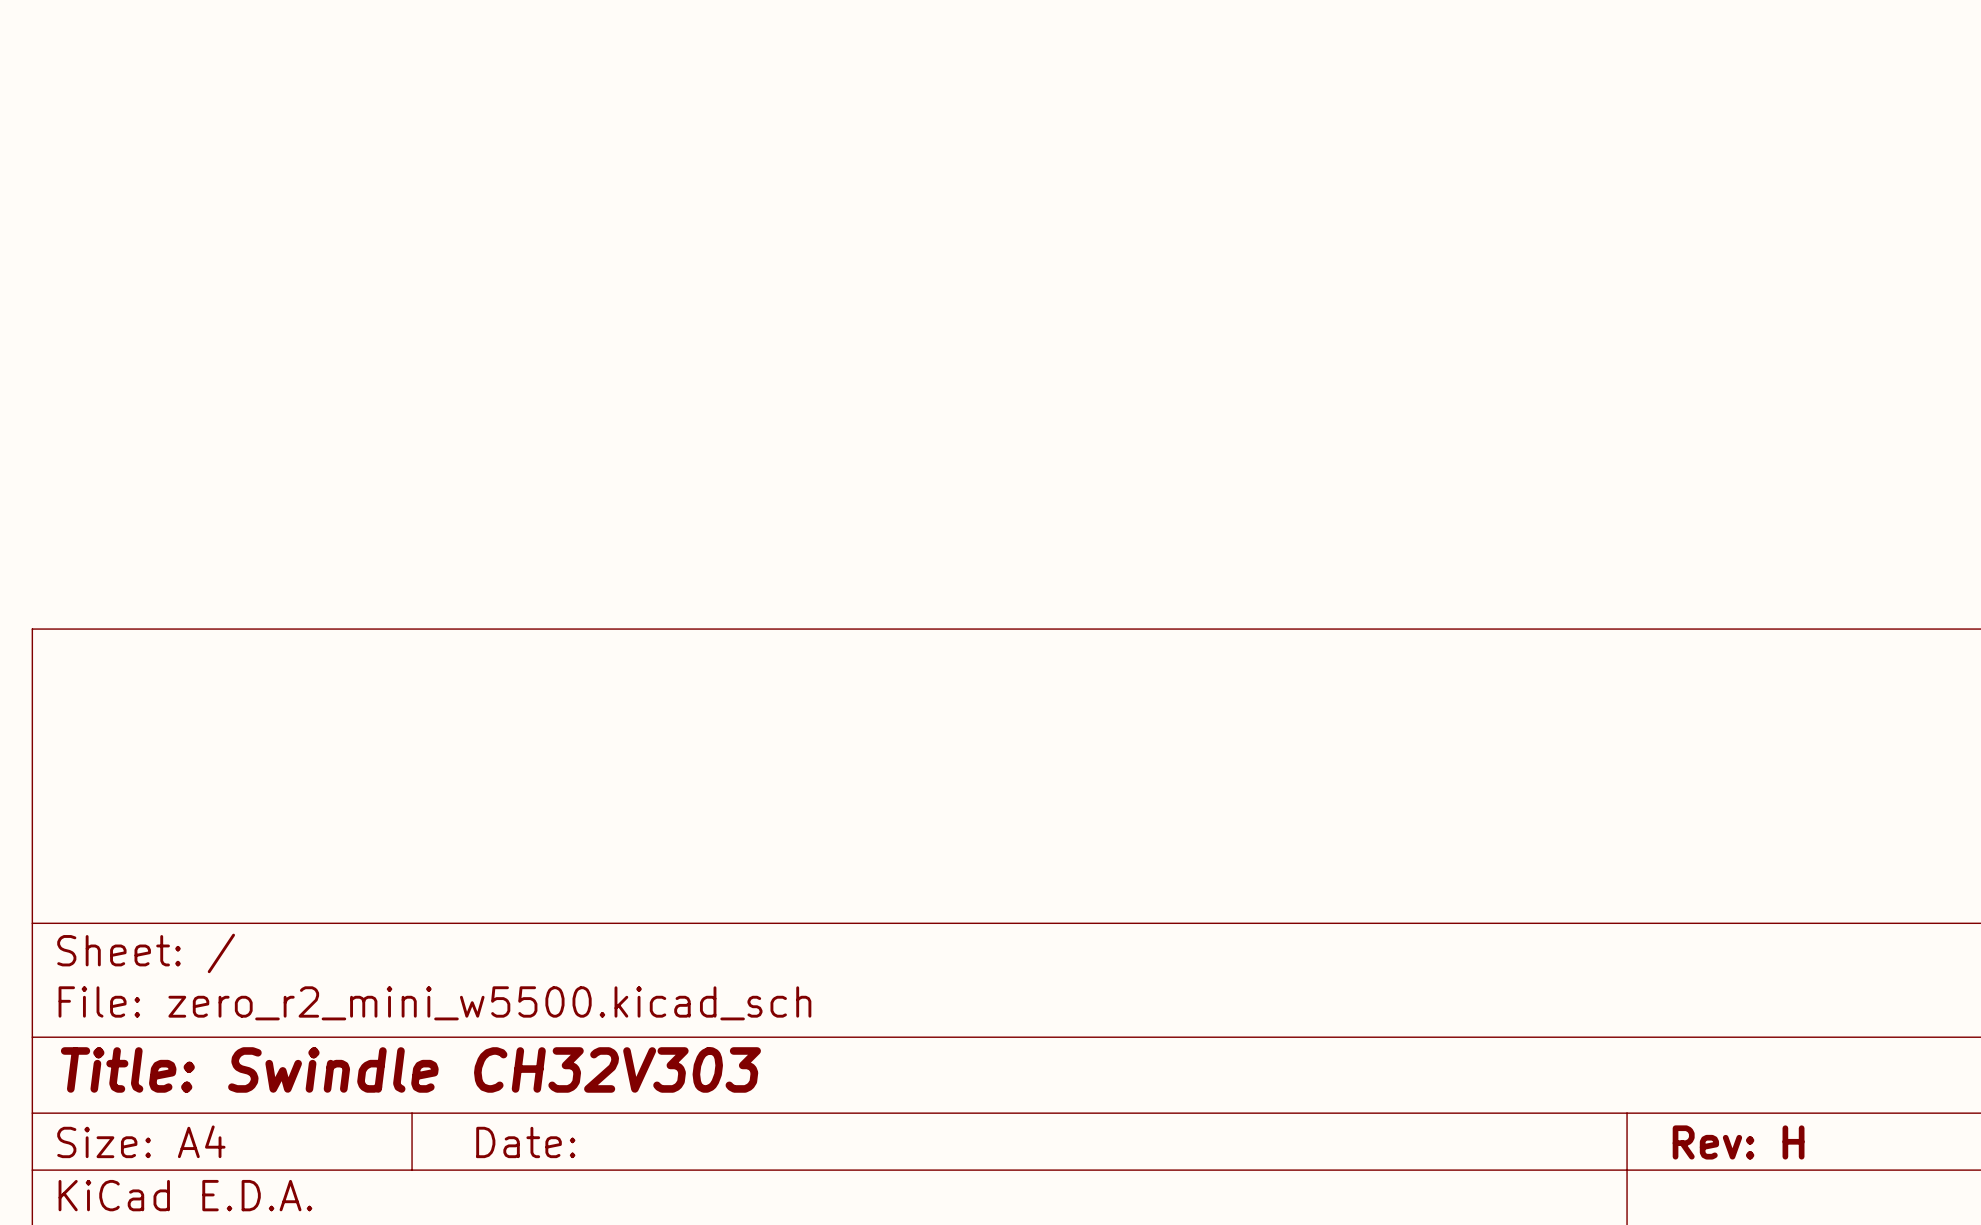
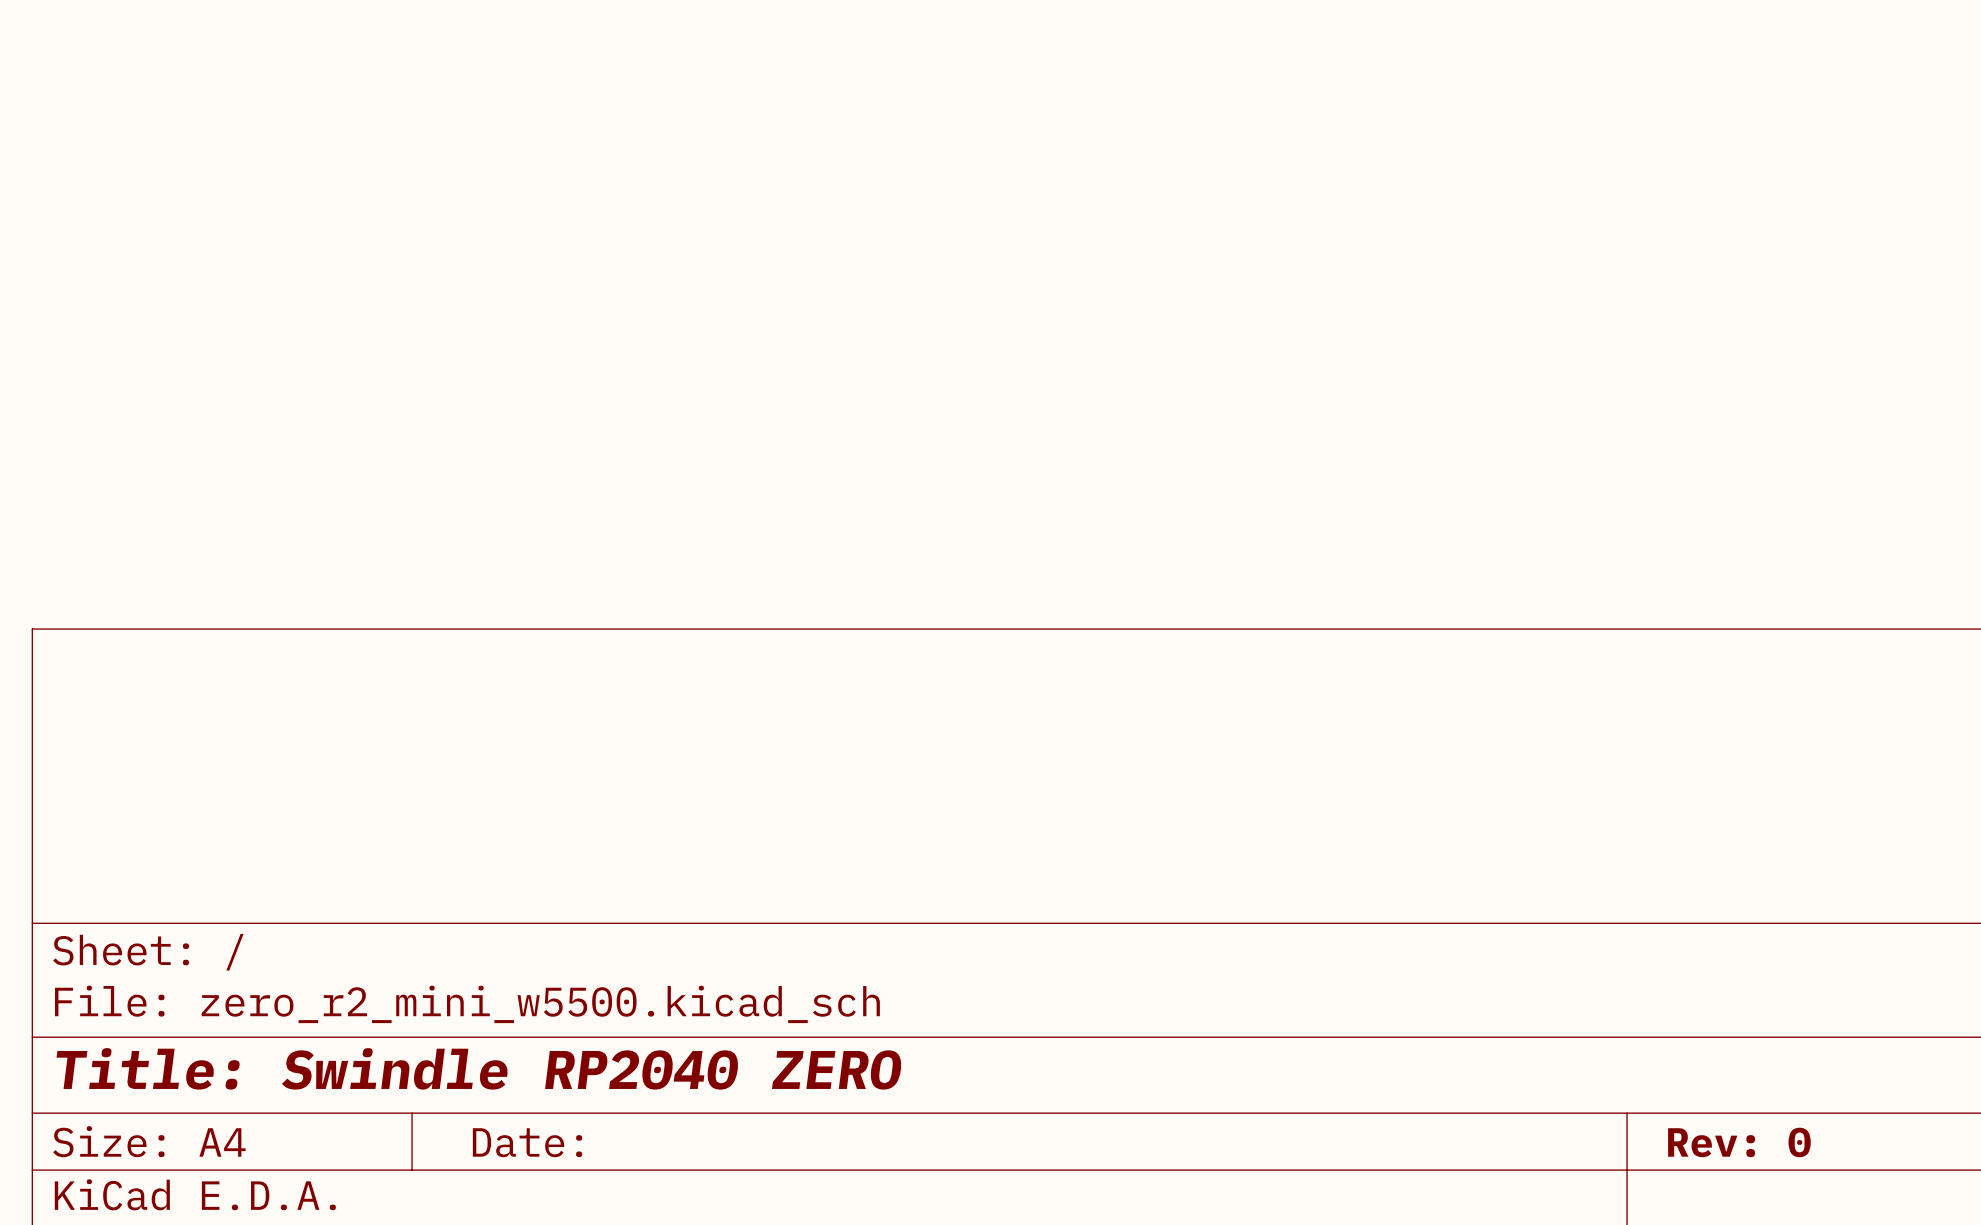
title block: Title: Swindle CH32V303 (410, 1069) -> Title: Swindle RP2040 ZERO (479, 1068)
title block: Rev: H (1738, 1142) -> Rev: 0 (1739, 1142)

